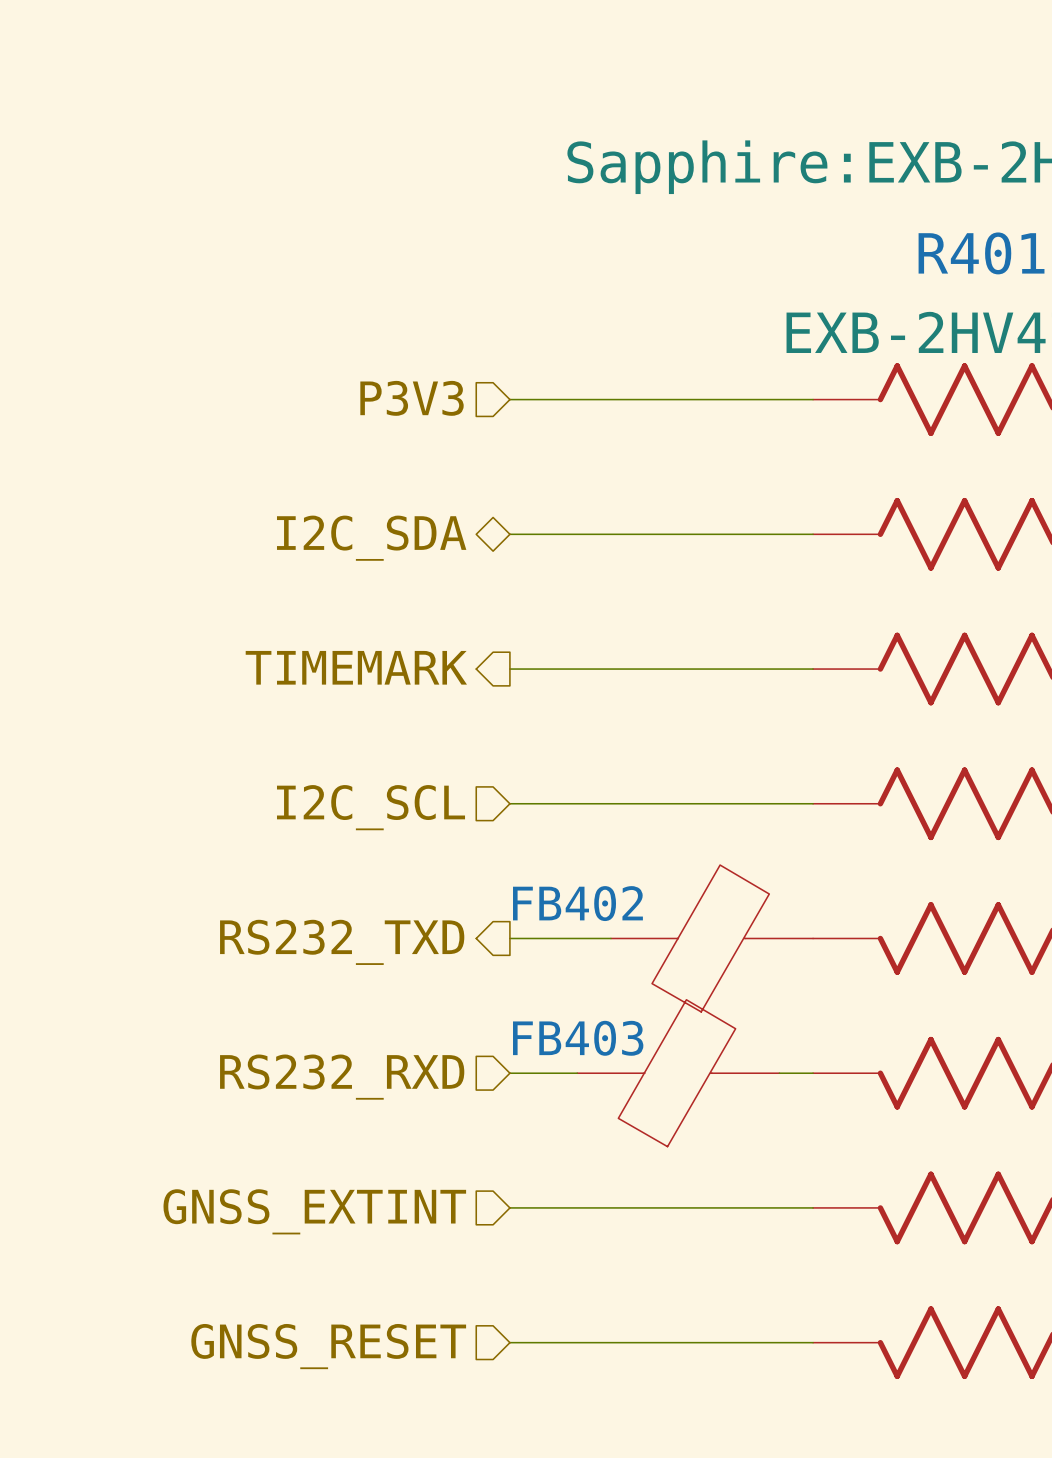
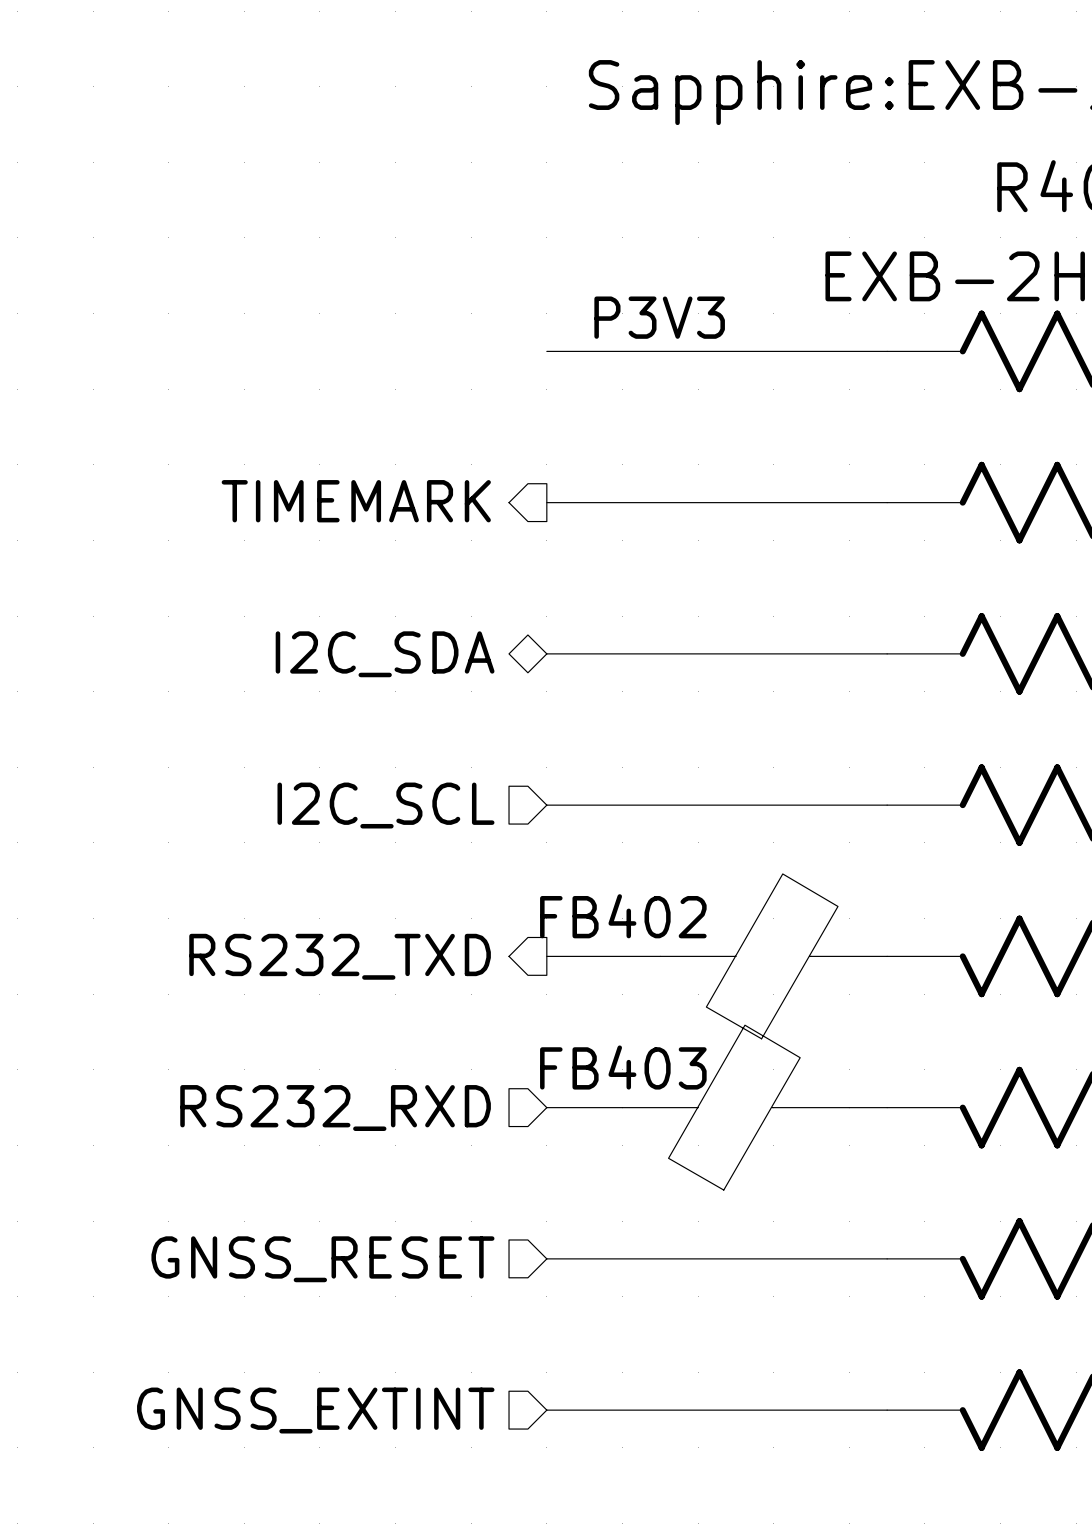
label: none -> P3V3 (659, 317)
hierarchical label: P3V3 (412, 398) -> none
hierarchical label shape: bidirectional (371, 538) -> output (356, 501)
hierarchical label: I2C_SDA (371, 538) -> TIMEMARK (356, 501)
hierarchical label shape: output (356, 667) -> bidirectional (385, 654)
hierarchical label: TIMEMARK (356, 667) -> I2C_SDA (385, 654)
hierarchical label: GNSS_EXTINT (314, 1211) -> GNSS_RESET (322, 1259)
hierarchical label: GNSS_RESET (328, 1346) -> GNSS_EXTINT (315, 1410)

